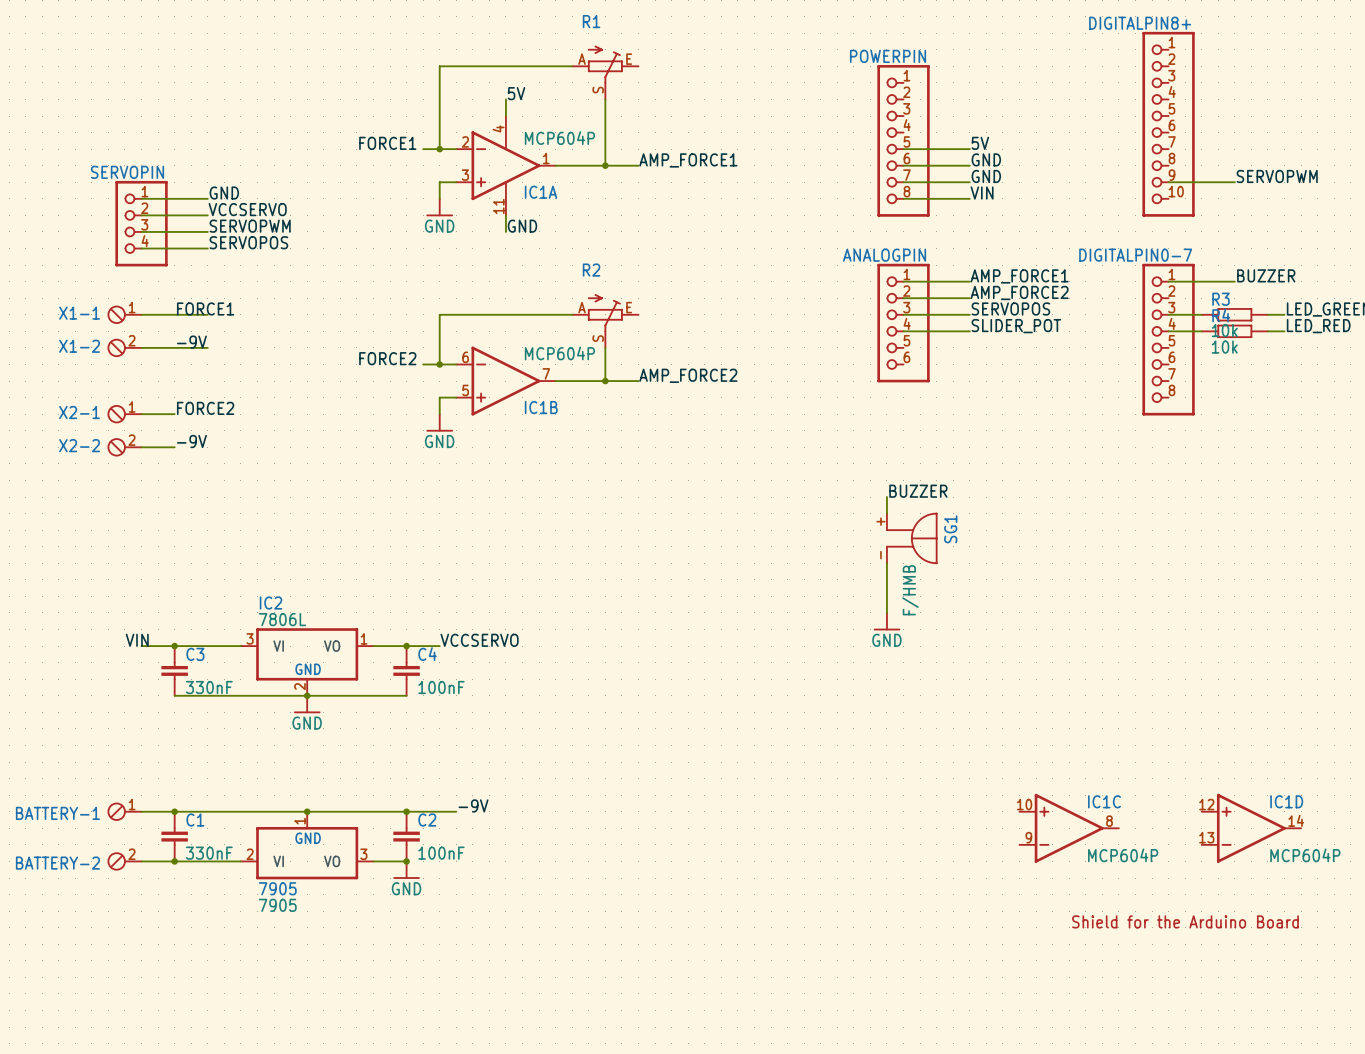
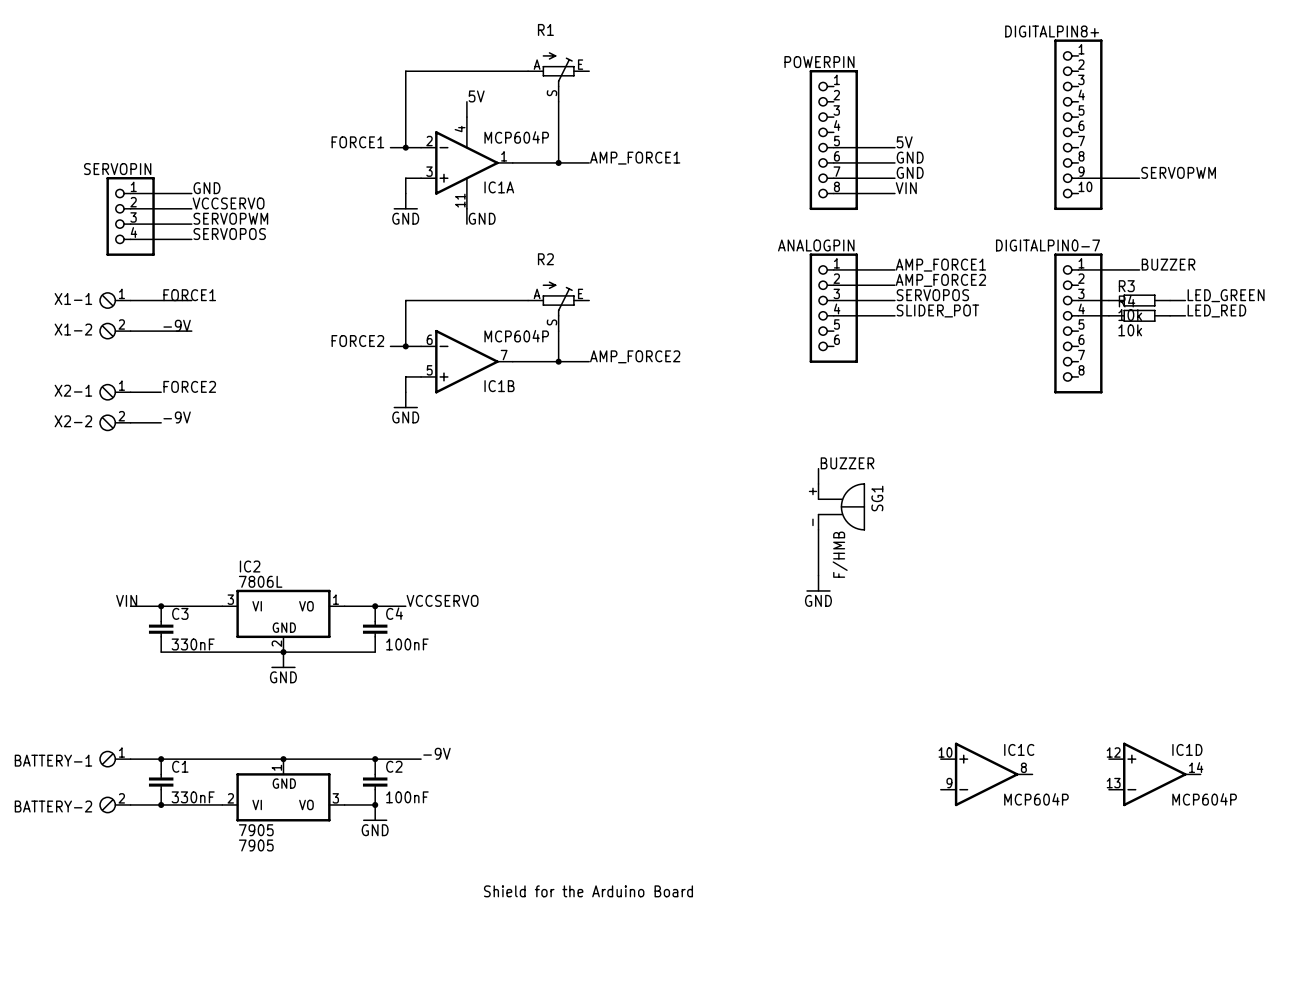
text: Shield for the Arduino Board (1185, 921) -> none
text: none -> Shield for the Arduino Board (588, 891)

